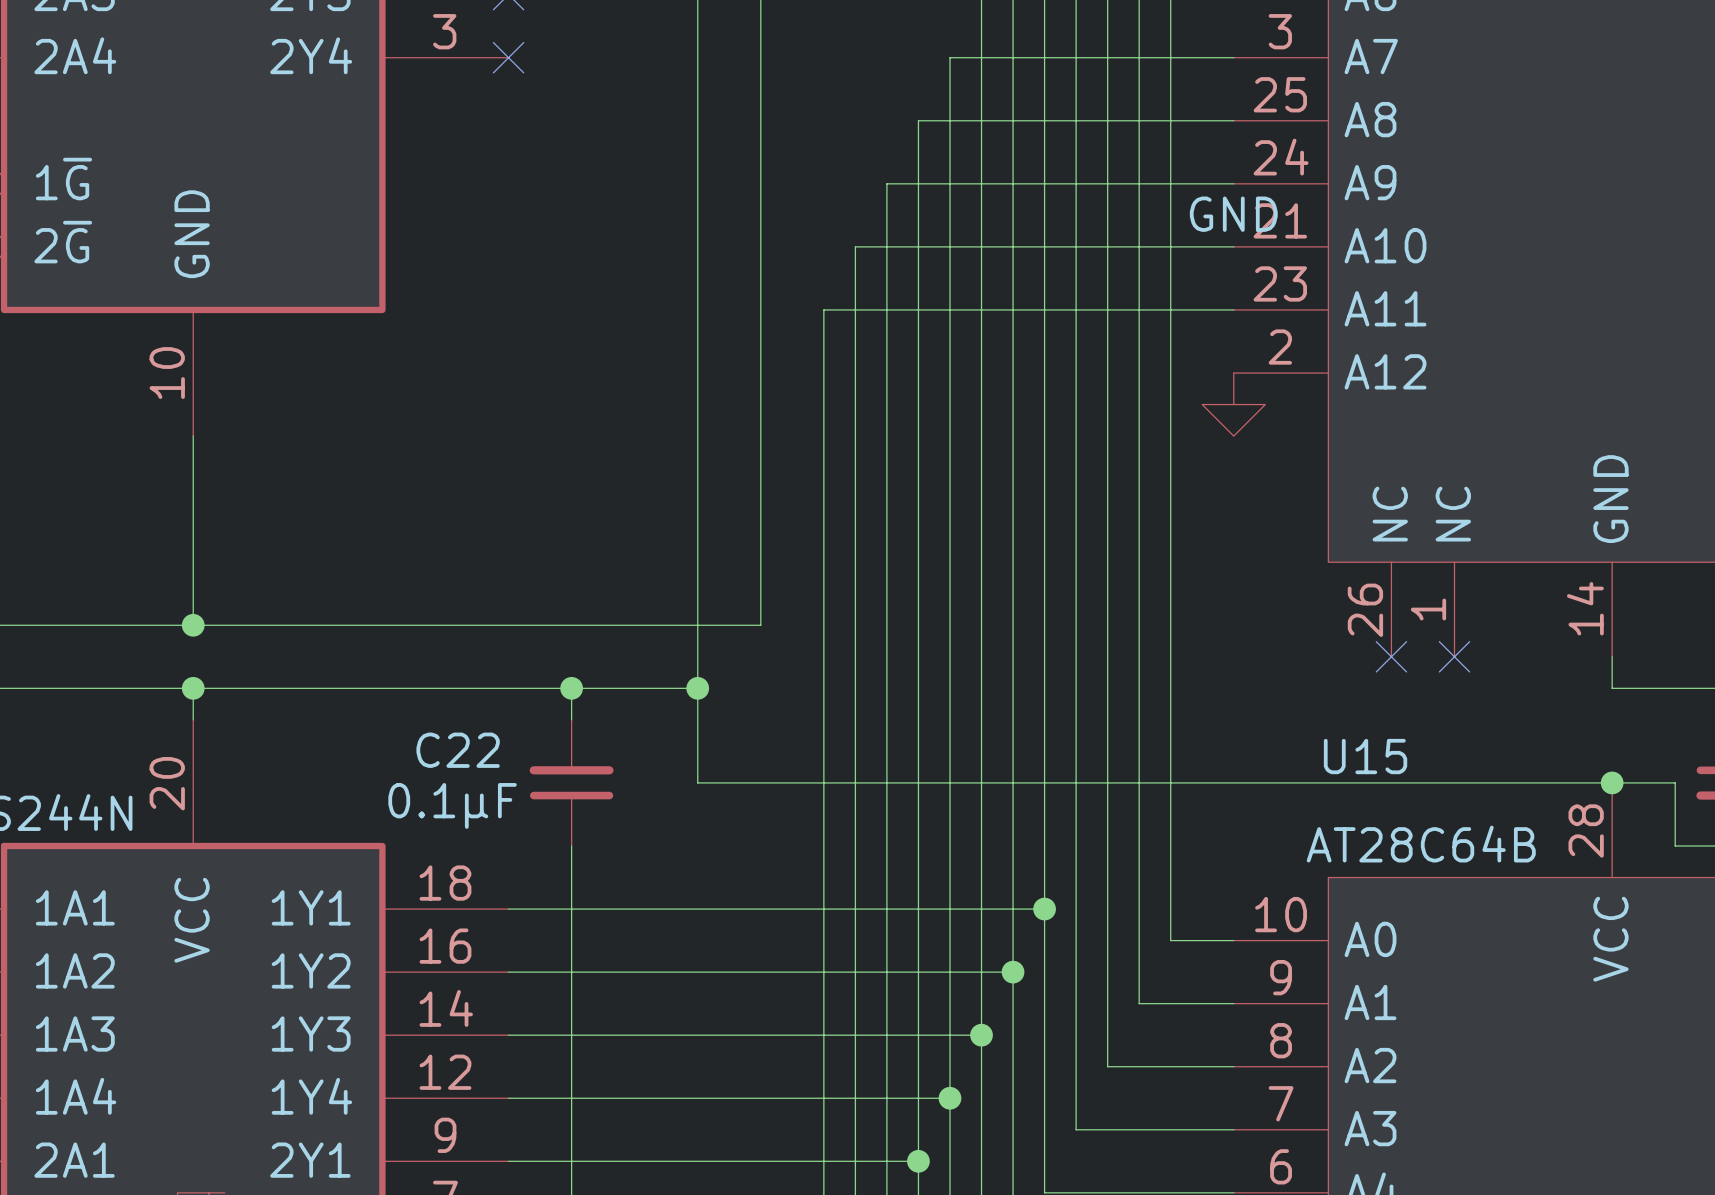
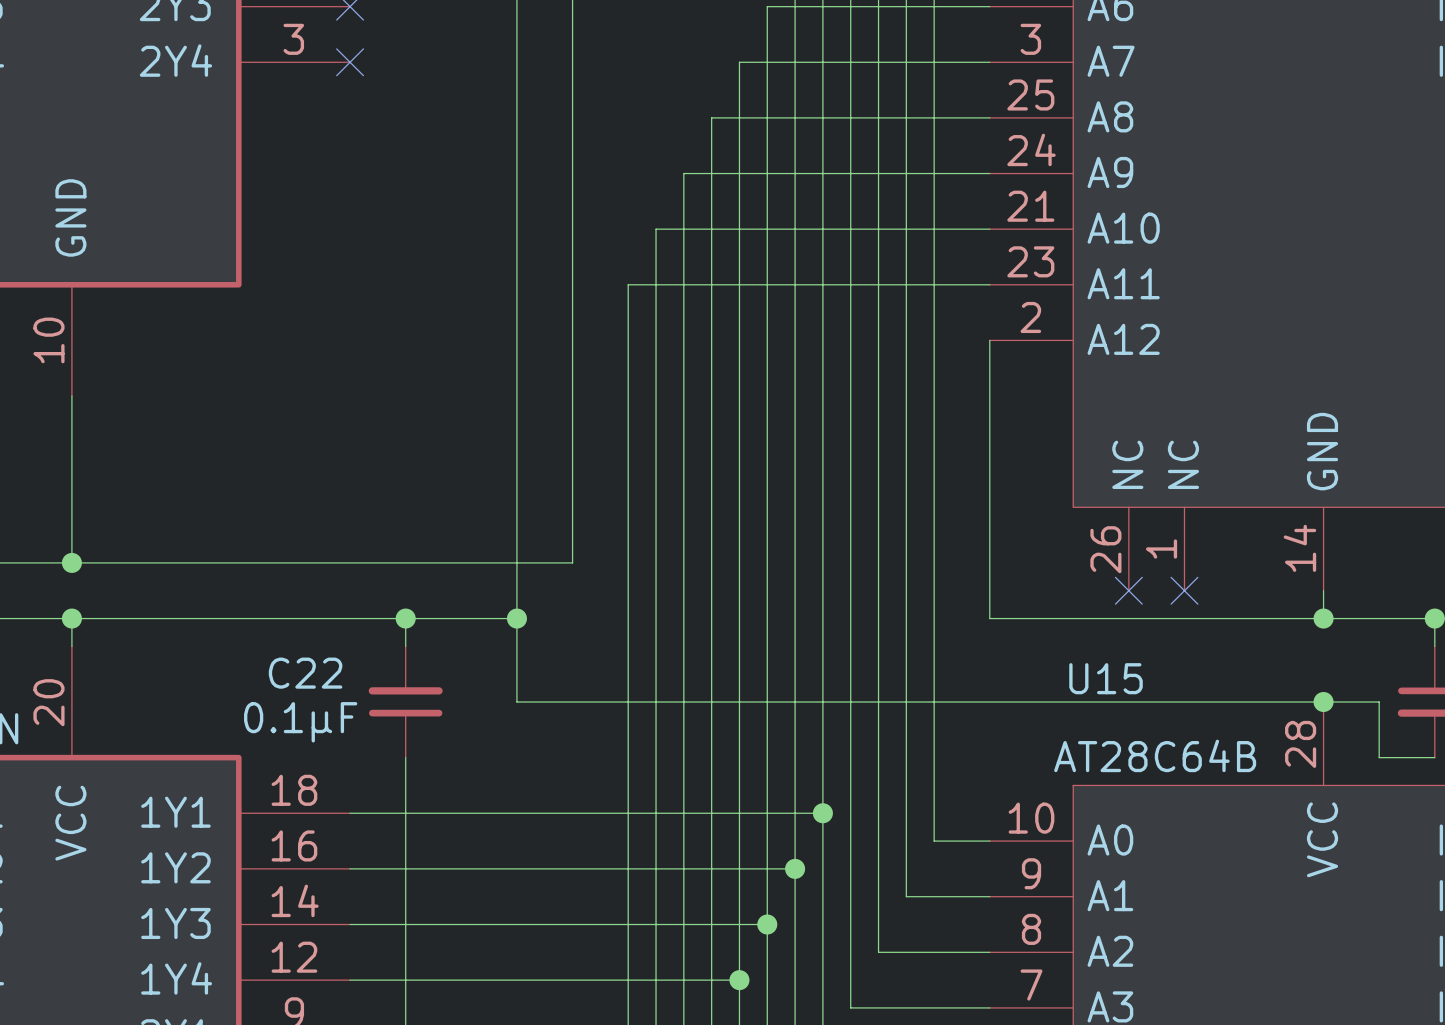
wire: none -> (989, 340) (989, 618) (1323, 618)
power symbol: GND (1233, 404) -> none
junction: none -> (1323, 618)

